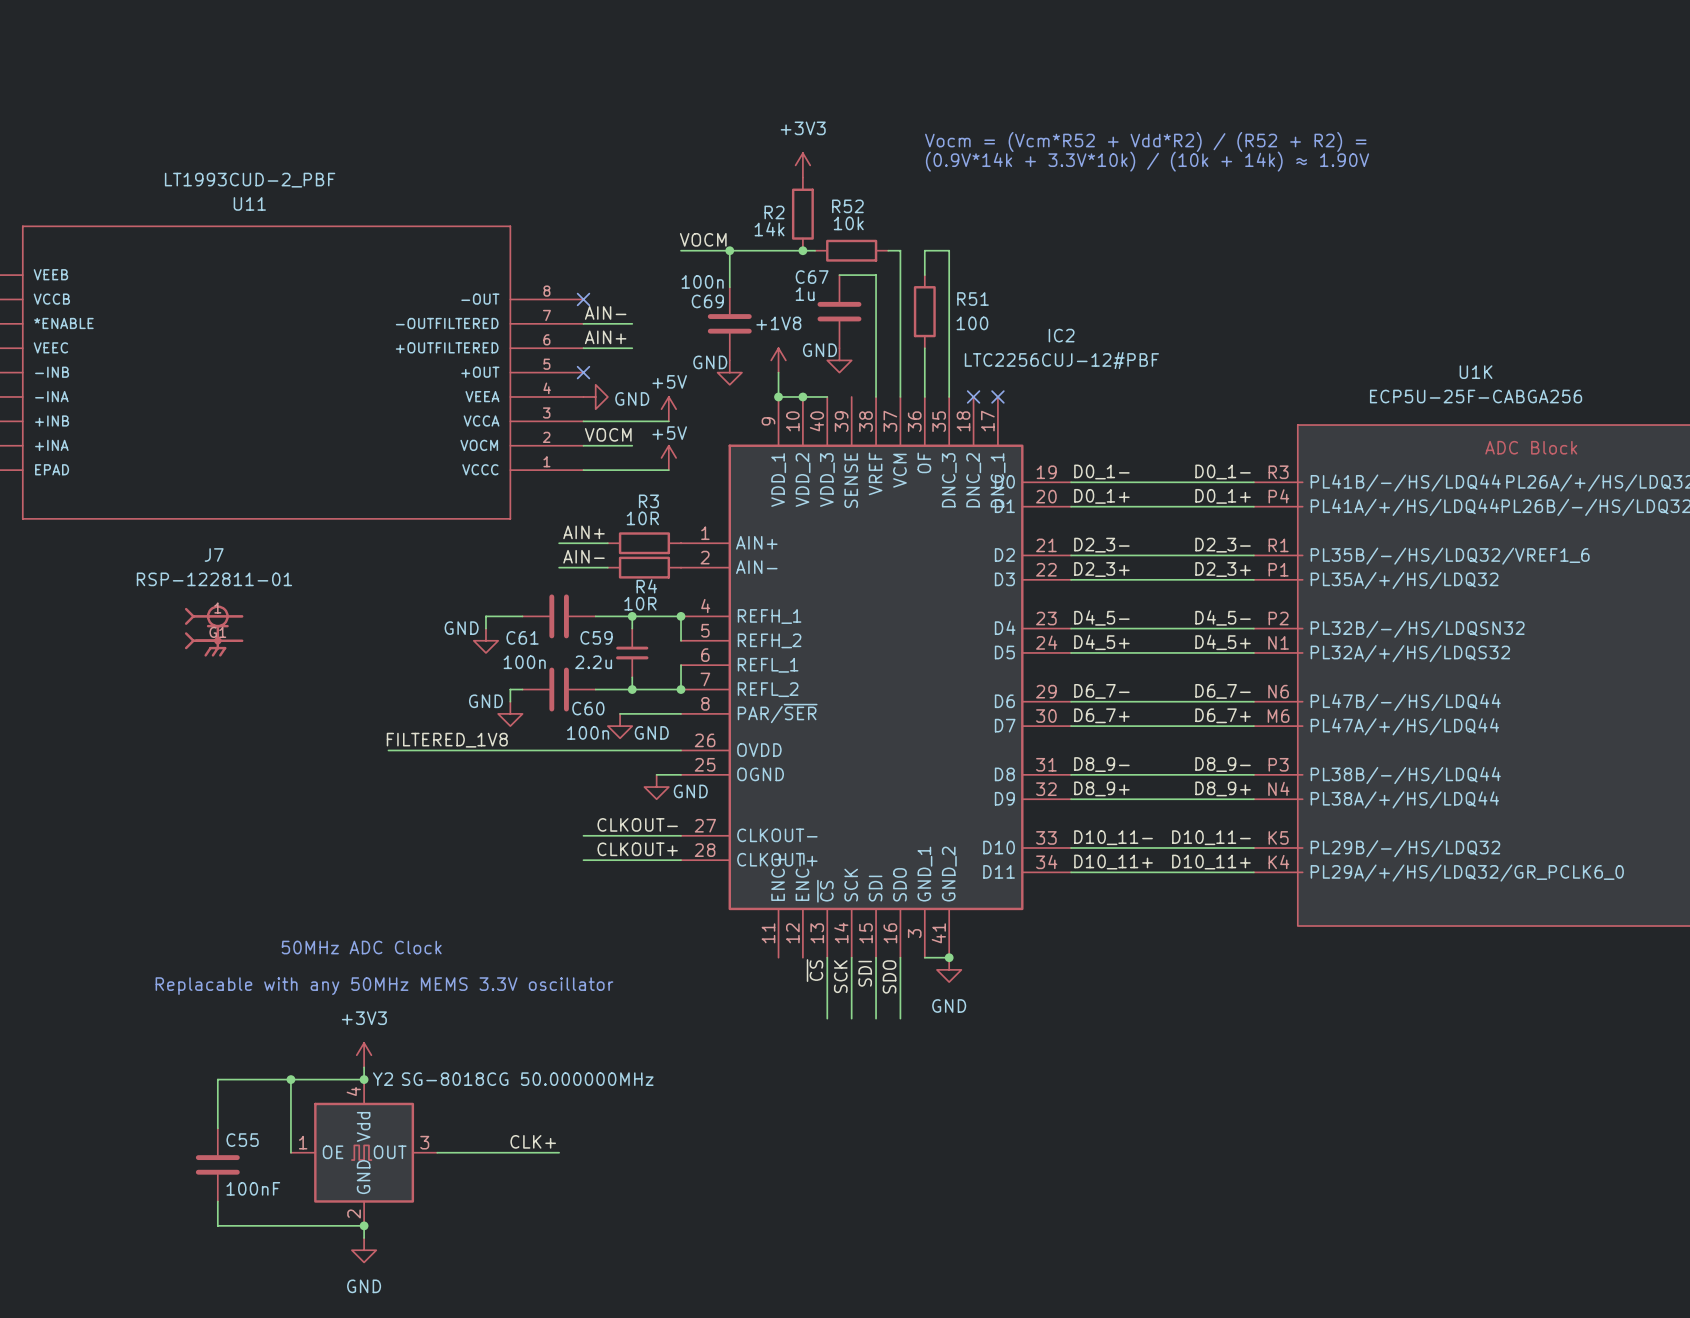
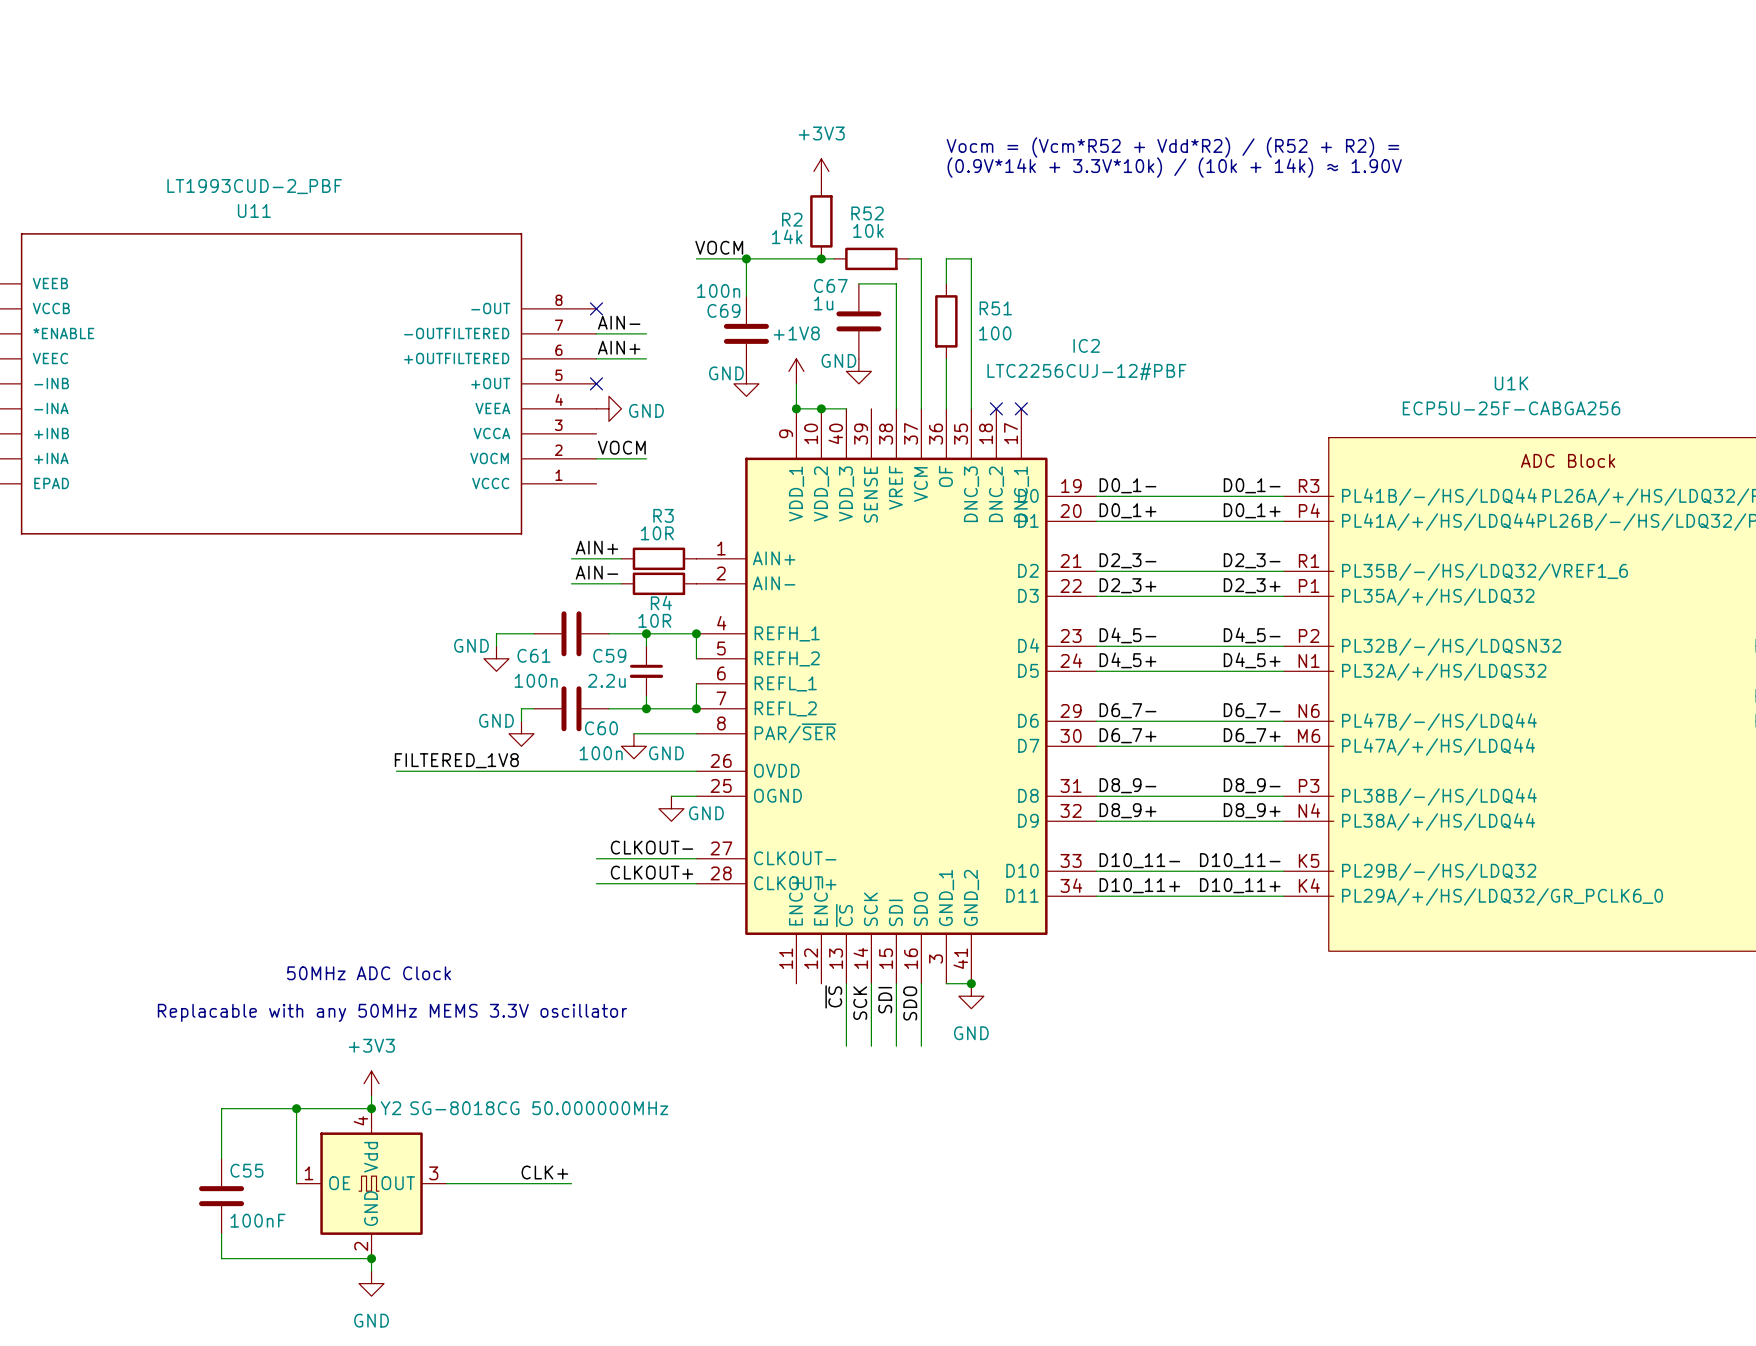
power symbol: +5V (668, 409) -> none
wire: (583, 421) (668, 421) -> none
power symbol: +5V (668, 457) -> none
wire: (583, 470) (668, 470) -> none
J7: RSP-122811-01 (214, 631) -> none

